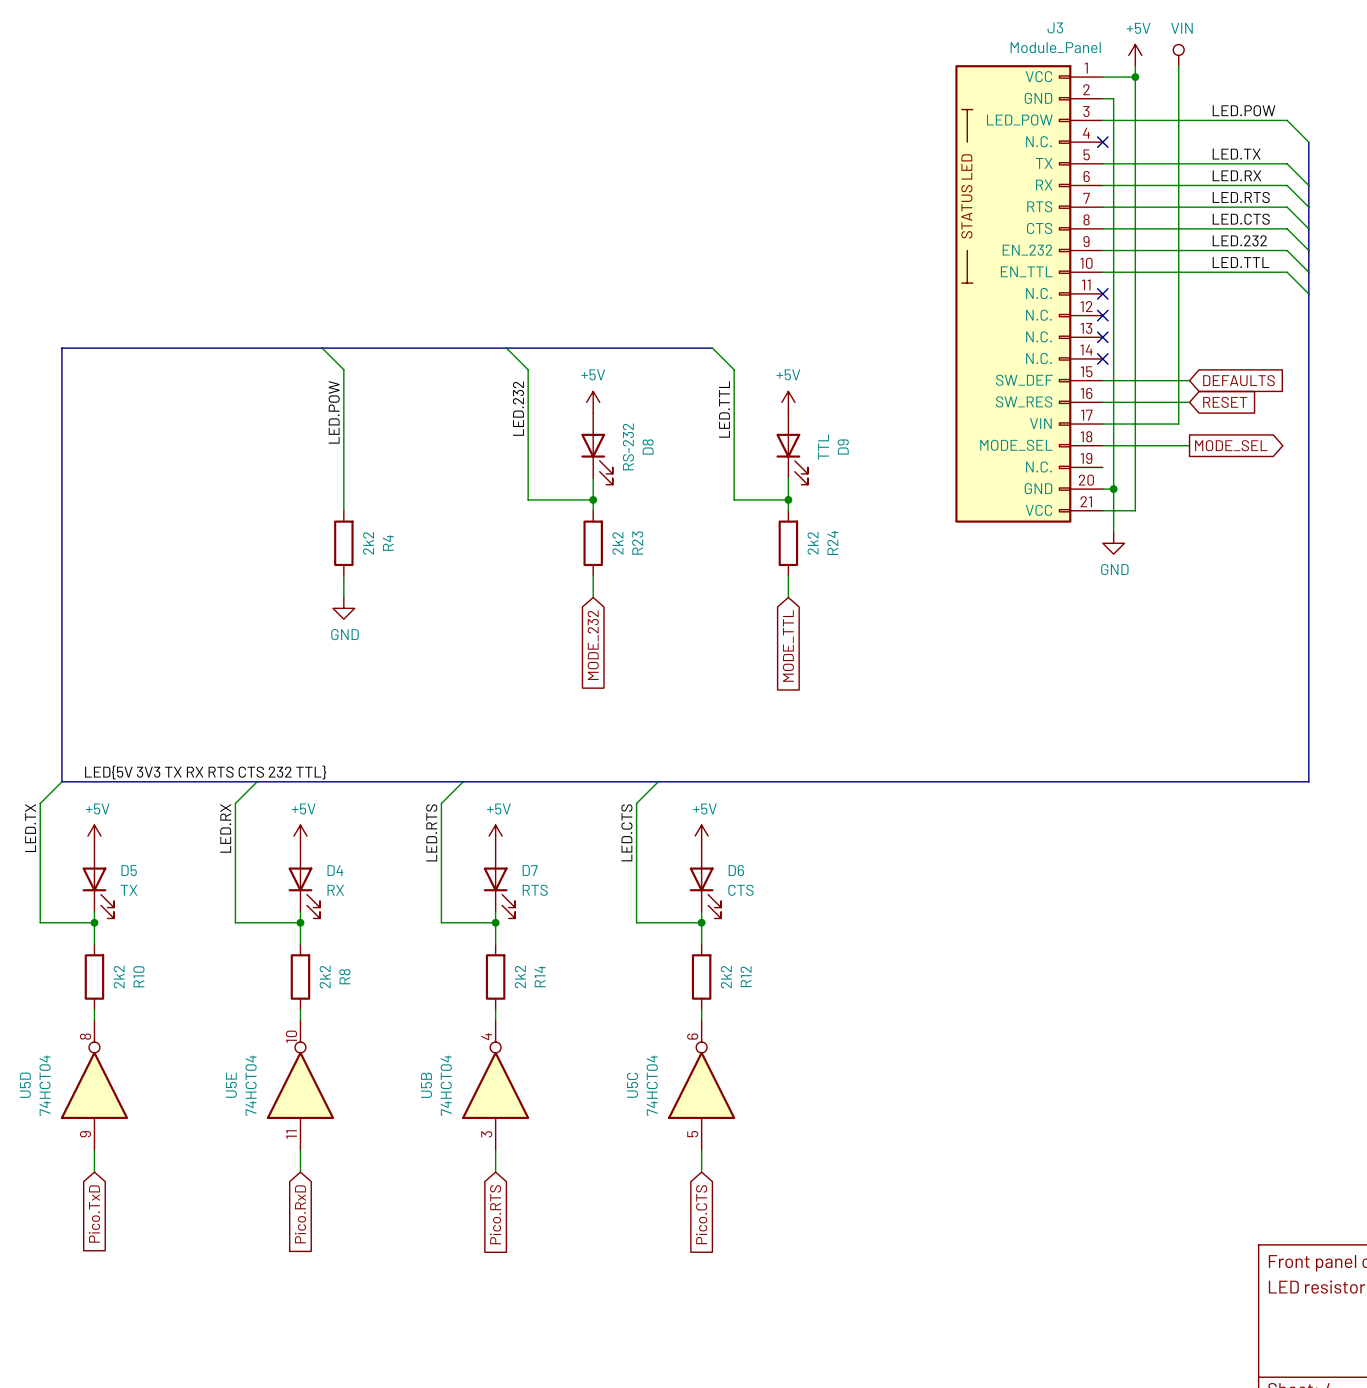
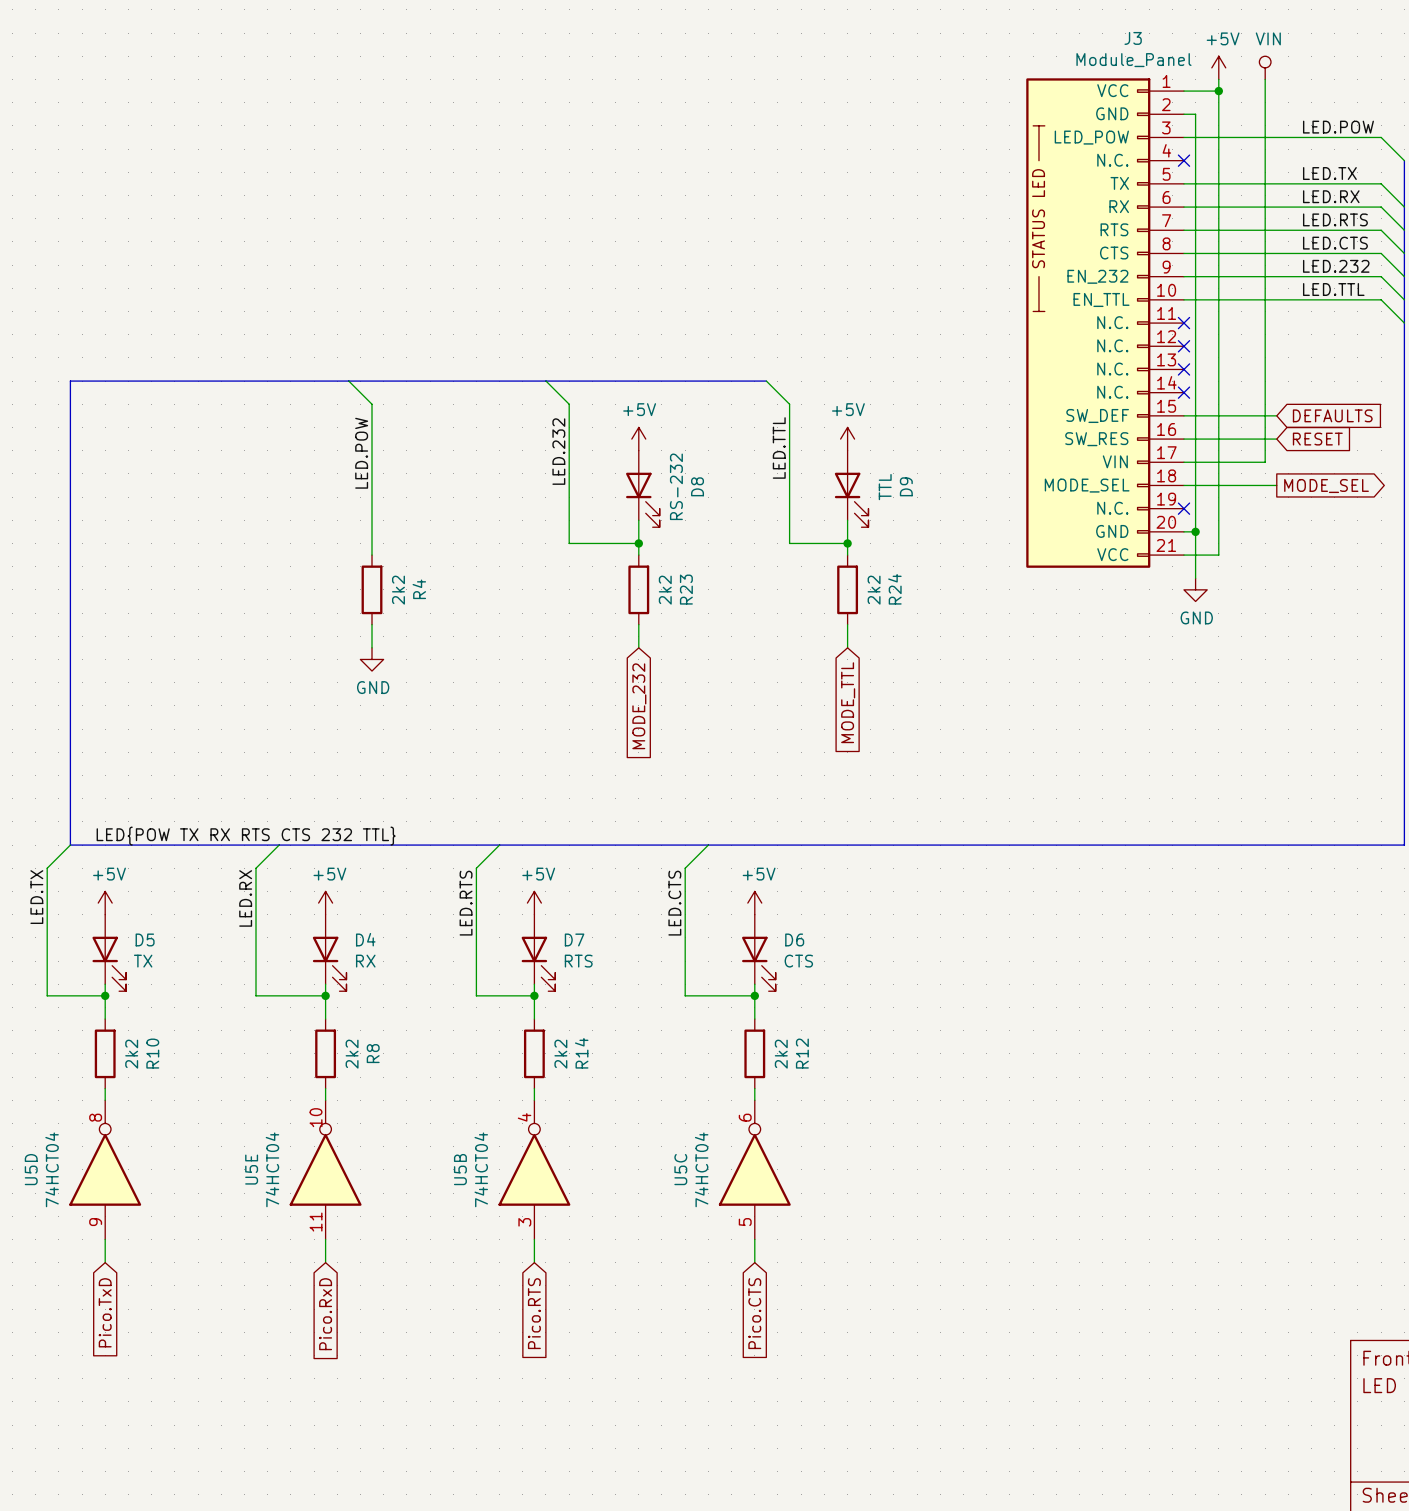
no-connect mark: none -> (1183, 508)
label: LED{5V 3V3 TX RX RTS CTS 232 TTL} (205, 772) -> LED{POW TX RX RTS CTS 232 TTL} (246, 836)

